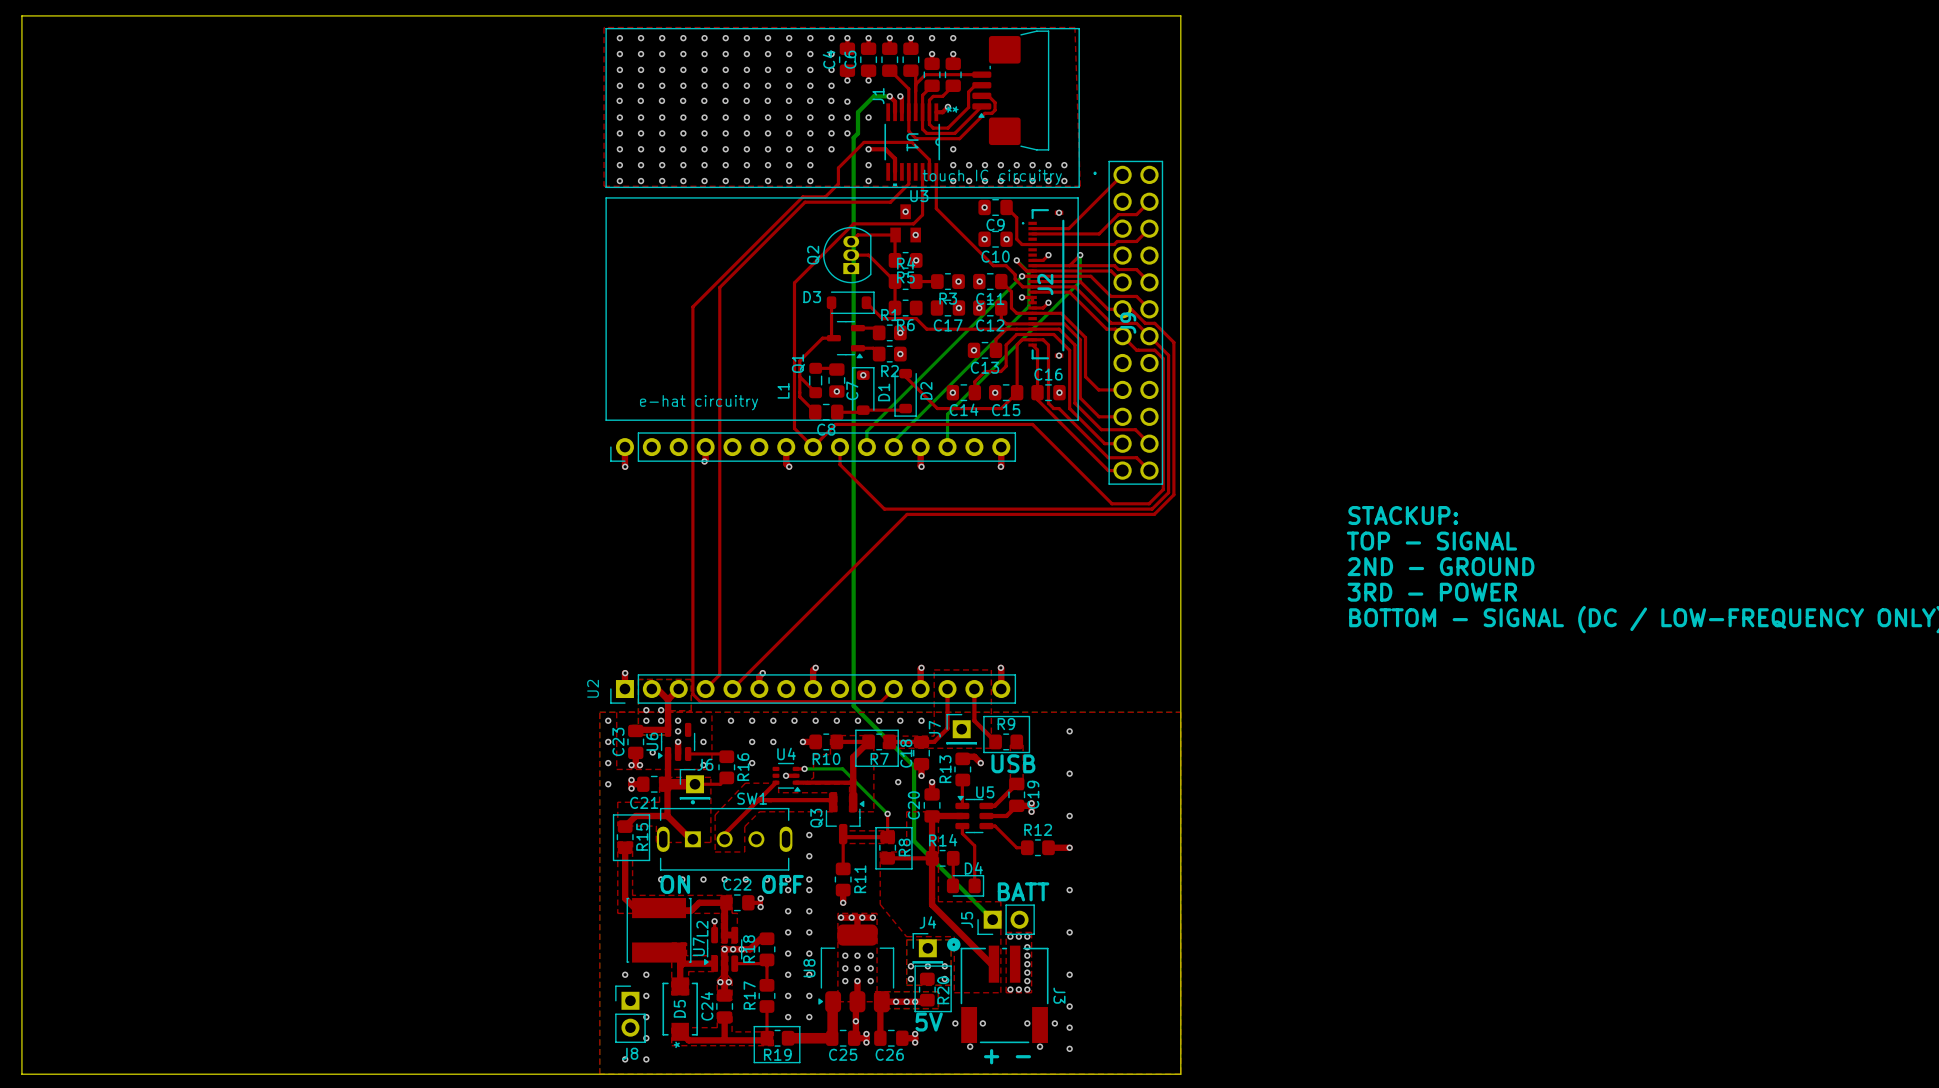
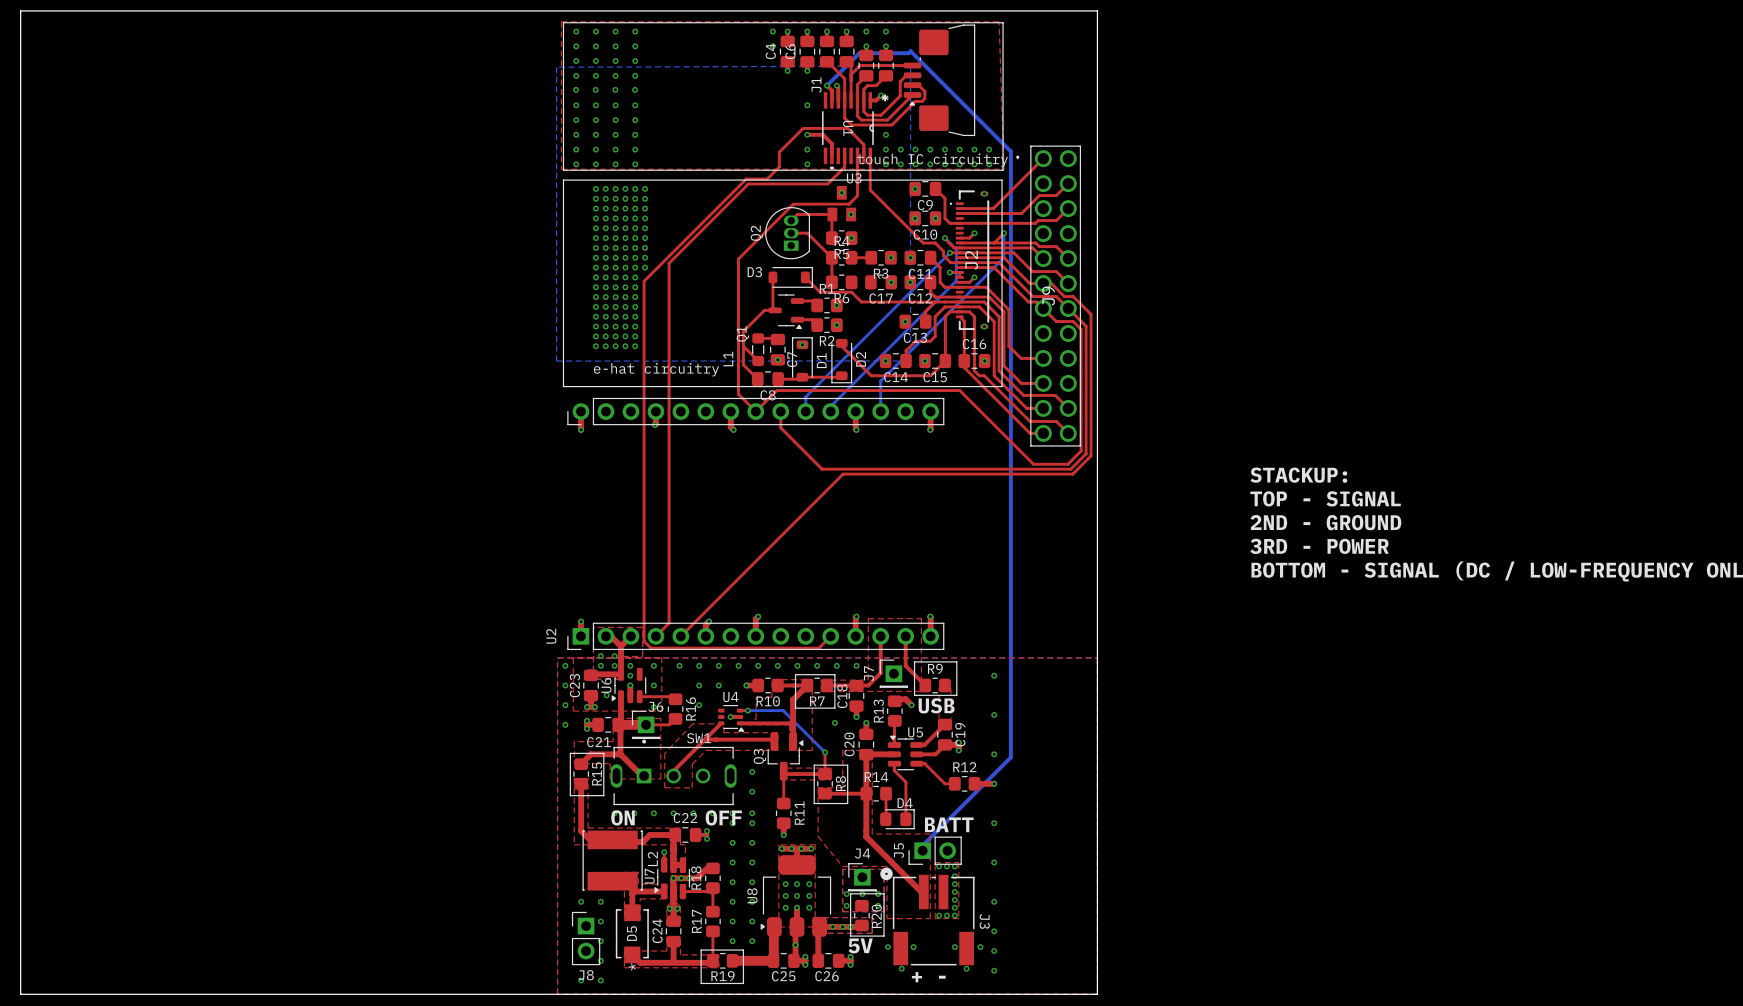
via: (704, 38) -> none
via: (725, 38) -> none
via: (746, 38) -> none
via: (768, 38) -> none
via: (789, 38) -> none
via: (810, 38) -> none
via: (704, 54) -> none
via: (725, 54) -> none
via: (746, 54) -> none
via: (768, 54) -> none
via: (789, 54) -> none
via: (810, 54) -> none
via: (704, 69) -> none
via: (725, 69) -> none
via: (746, 69) -> none
via: (768, 69) -> none
via: (789, 69) -> none
via: (810, 69) -> none
via: (831, 69) -> none
bottom zone outline: none -> (910, 66) (910, 360) (556, 361) (556, 67) (910, 66)
via: (704, 85) -> none
via: (725, 85) -> none
via: (746, 85) -> none
via: (768, 85) -> none
via: (789, 85) -> none
via: (810, 85) -> none
via: (831, 85) -> none
bottom track: (889, 96) (873, 96) (858, 112) (858, 133) (853, 137) (853, 705) (914, 766) (914, 841) (992, 919) -> (827, 85) (859, 53) (908, 53) (910, 51) (1010, 151) (1010, 757) (922, 845) (922, 850)
via: (704, 100) -> none
via: (725, 100) -> none
via: (746, 100) -> none
via: (767, 100) -> none
via: (788, 100) -> none
via: (810, 100) -> none
via: (831, 100) -> none
via: (847, 101) -> none
via: (704, 117) -> none
via: (725, 117) -> none
via: (746, 117) -> none
via: (768, 117) -> none
via: (789, 117) -> none
via: (810, 117) -> none
via: (831, 117) -> none
via: (847, 117) -> none
via: (704, 133) -> none
via: (725, 133) -> none
via: (746, 133) -> none
via: (768, 133) -> none
via: (789, 133) -> none
via: (810, 133) -> none
via: (831, 133) -> none
via: (847, 133) -> none
via: (704, 149) -> none
via: (725, 149) -> none
via: (746, 149) -> none
via: (768, 149) -> none
via: (789, 149) -> none
via: (810, 149) -> none
via: (831, 149) -> none
via: (704, 165) -> none
via: (725, 165) -> none
via: (746, 165) -> none
via: (768, 165) -> none
via: (789, 165) -> none
via: (810, 165) -> none
via: (704, 181) -> none
via: (725, 181) -> none
via: (746, 181) -> none
via: (768, 181) -> none
via: (789, 181) -> none
via: (810, 181) -> none
via: none -> (595, 188)
via: none -> (605, 188)
via: none -> (615, 188)
via: none -> (625, 188)
via: none -> (635, 188)
via: none -> (645, 188)
via: none -> (595, 198)
via: none -> (605, 198)
via: none -> (615, 198)
via: none -> (625, 198)
via: none -> (635, 198)
via: none -> (645, 198)
via: none -> (595, 208)
via: none -> (605, 208)
via: none -> (615, 208)
via: none -> (625, 208)
via: none -> (635, 208)
via: none -> (645, 208)
via: none -> (595, 218)
via: none -> (605, 218)
via: none -> (615, 218)
via: none -> (625, 218)
via: none -> (635, 218)
via: none -> (645, 218)
via: none -> (595, 228)
via: none -> (605, 228)
via: none -> (615, 228)
via: none -> (625, 228)
via: none -> (635, 228)
via: none -> (645, 228)
via: none -> (595, 238)
via: none -> (605, 238)
via: none -> (615, 238)
via: none -> (625, 238)
via: none -> (635, 238)
via: none -> (645, 238)
via: none -> (595, 247)
via: none -> (605, 247)
via: none -> (615, 247)
via: none -> (625, 247)
via: none -> (635, 247)
via: none -> (645, 247)
via: none -> (595, 257)
via: none -> (605, 257)
via: none -> (615, 257)
via: none -> (625, 257)
via: none -> (635, 257)
via: none -> (645, 257)
via: none -> (595, 267)
via: none -> (605, 267)
via: none -> (615, 267)
via: none -> (625, 267)
via: none -> (635, 267)
via: none -> (645, 267)
via: none -> (595, 277)
via: none -> (605, 277)
via: none -> (615, 277)
via: none -> (625, 277)
via: none -> (635, 277)
via: none -> (595, 287)
via: none -> (605, 287)
via: none -> (615, 287)
via: none -> (625, 287)
via: none -> (635, 287)
via: none -> (595, 297)
via: none -> (605, 297)
via: none -> (615, 297)
via: none -> (625, 297)
via: none -> (635, 297)
via: none -> (595, 306)
via: none -> (605, 306)
via: none -> (615, 306)
via: none -> (625, 306)
via: none -> (635, 306)
via: none -> (595, 316)
via: none -> (605, 316)
via: none -> (615, 316)
via: none -> (625, 316)
via: none -> (635, 316)
via: none -> (595, 326)
via: none -> (605, 326)
via: none -> (615, 326)
via: none -> (625, 326)
via: none -> (635, 326)
via: none -> (595, 336)
via: none -> (605, 336)
via: none -> (615, 336)
via: none -> (625, 336)
via: none -> (635, 336)
via: none -> (595, 346)
via: none -> (605, 346)
via: none -> (615, 346)
via: none -> (625, 346)
via: none -> (635, 346)

